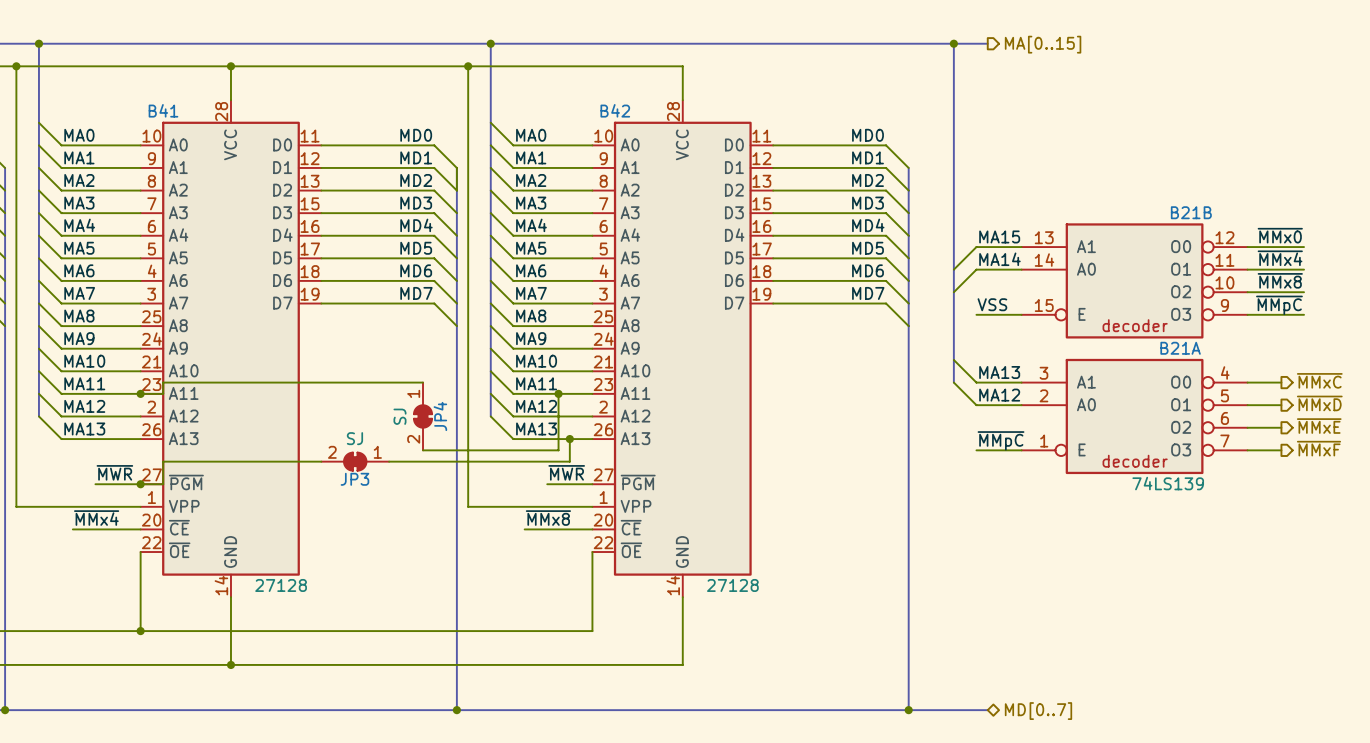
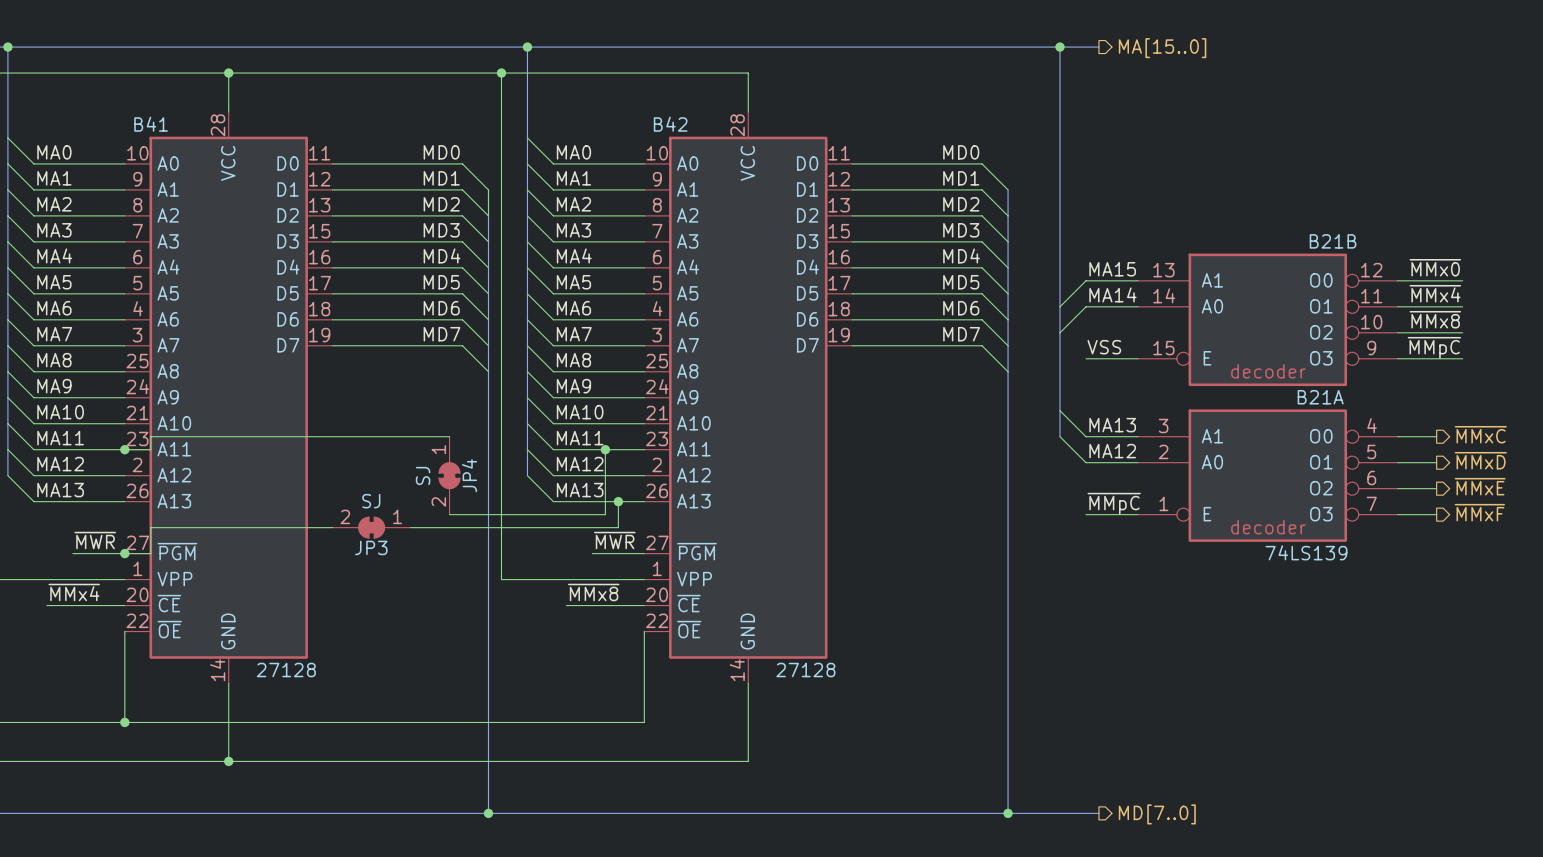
hierarchical label: MA[0..15] (1043, 44) -> MA[15..0] (1162, 48)
hierarchical label shape: bidirectional (1038, 711) -> output (1157, 814)
hierarchical label: MD[0..7] (1038, 711) -> MD[7..0] (1157, 814)

